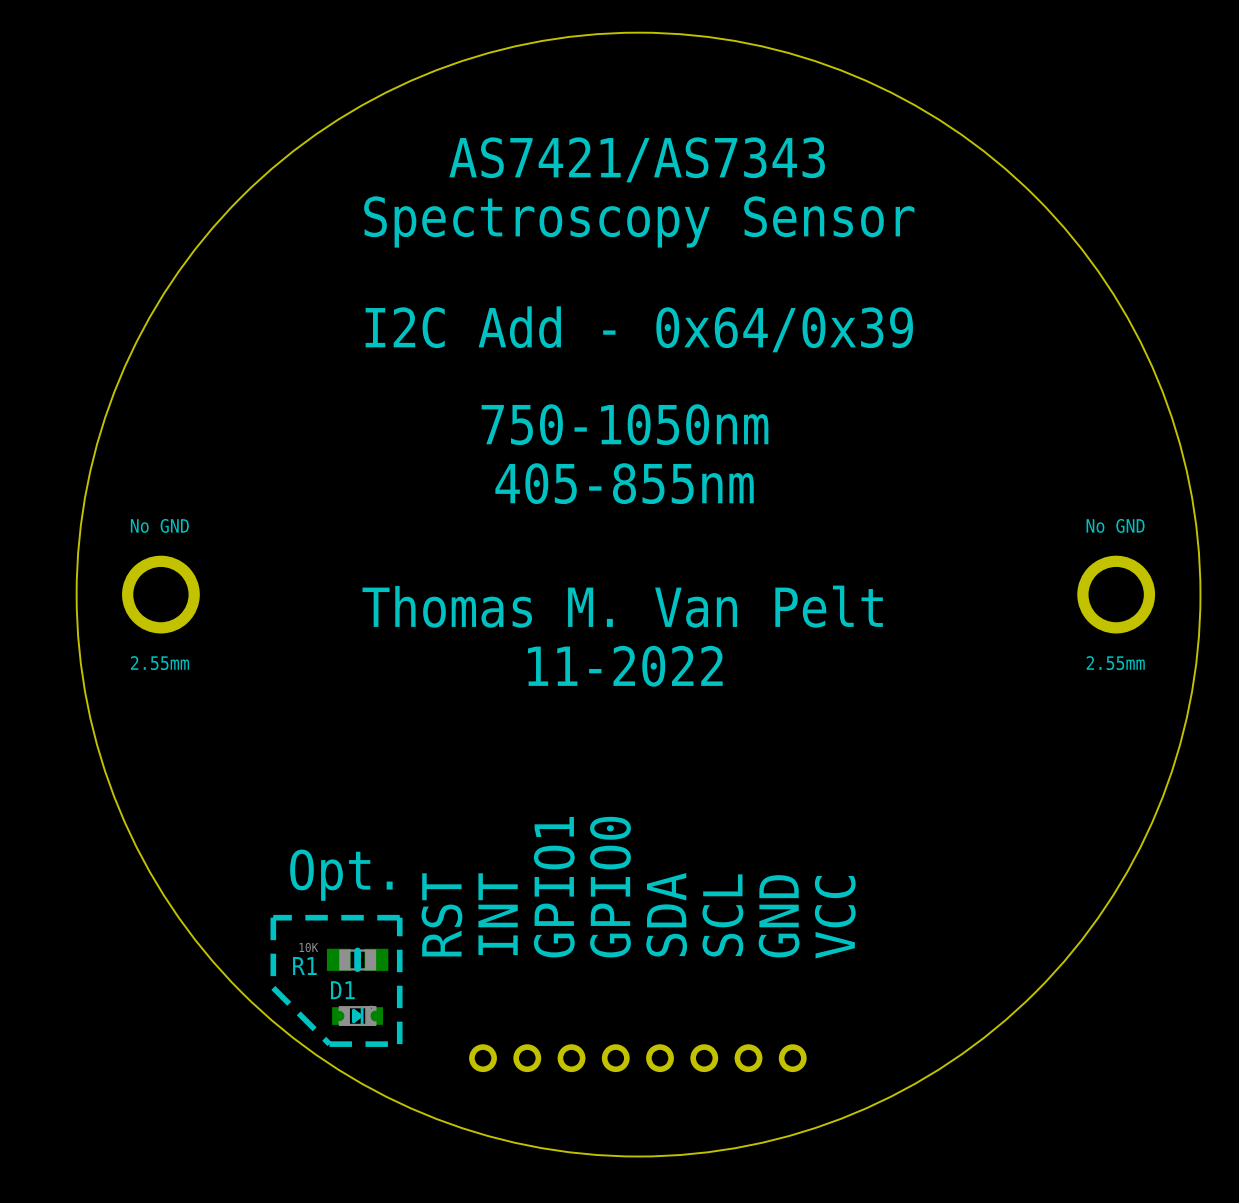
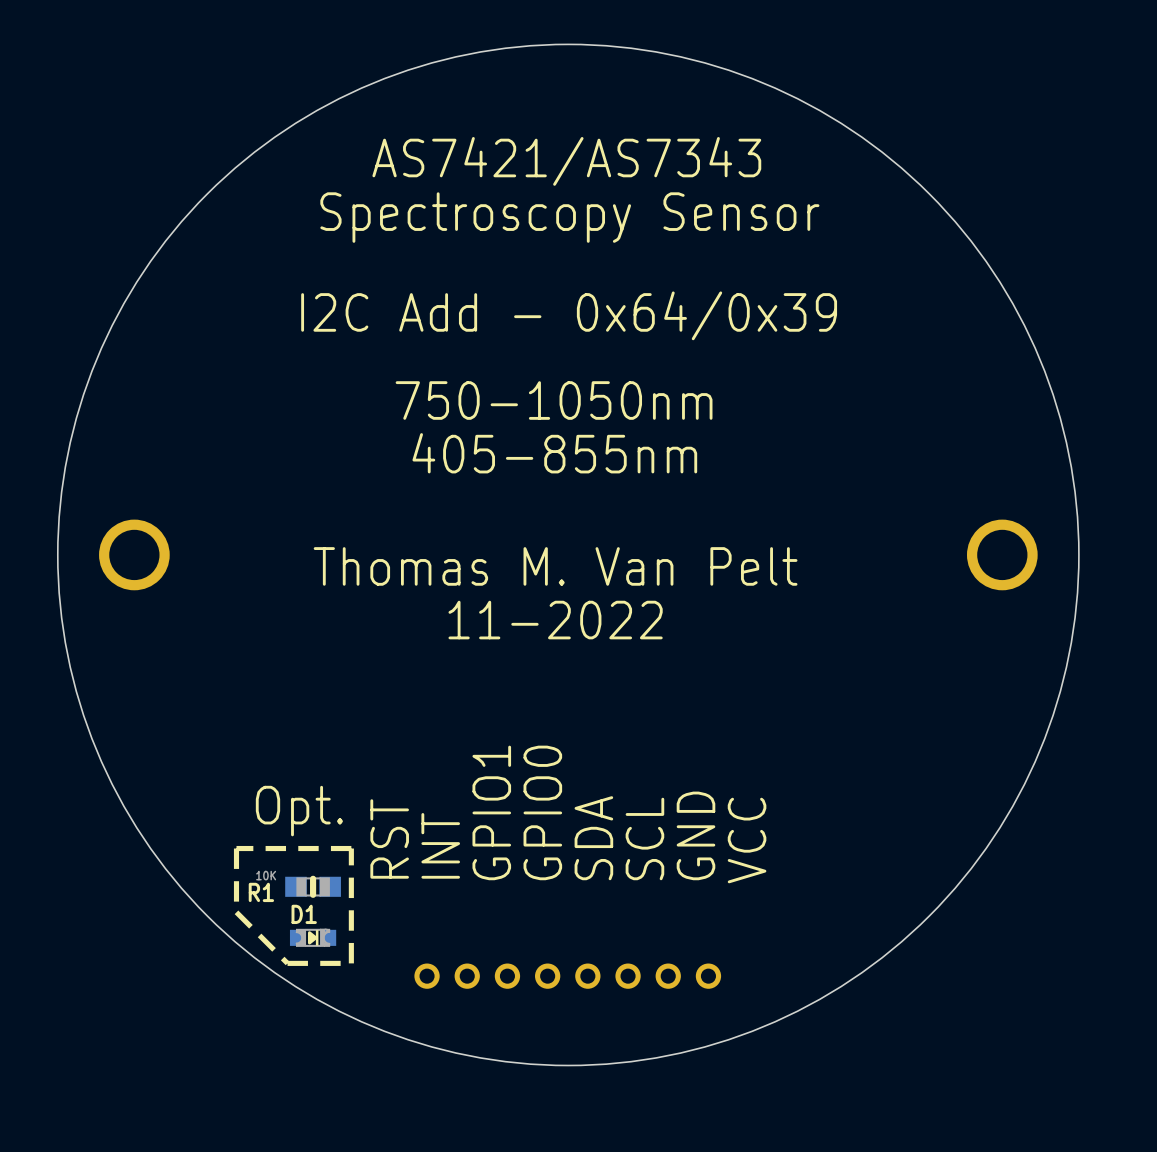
text: No GND (159, 525) -> none
text: No GND (1115, 525) -> none
text: 2.55mm (160, 663) -> none
text: 2.55mm (1115, 663) -> none

